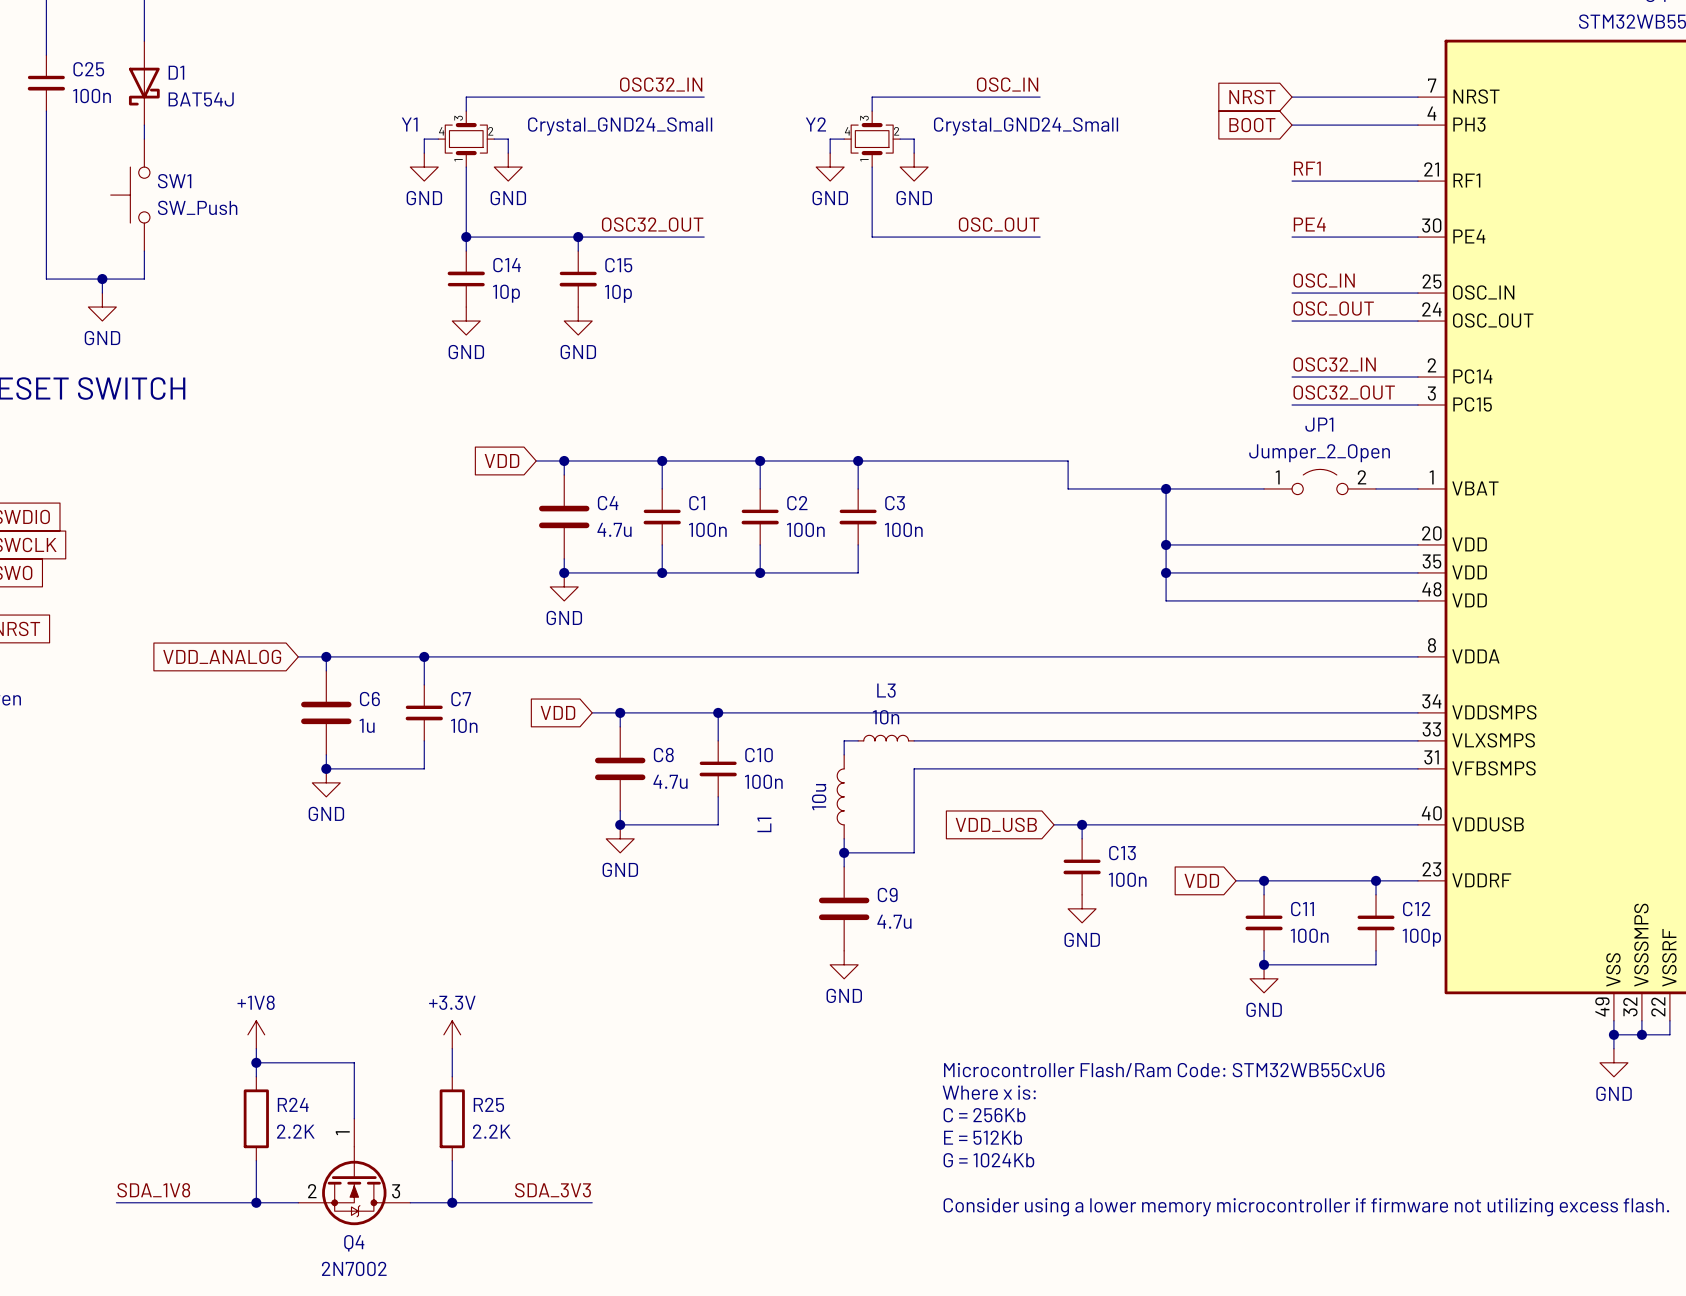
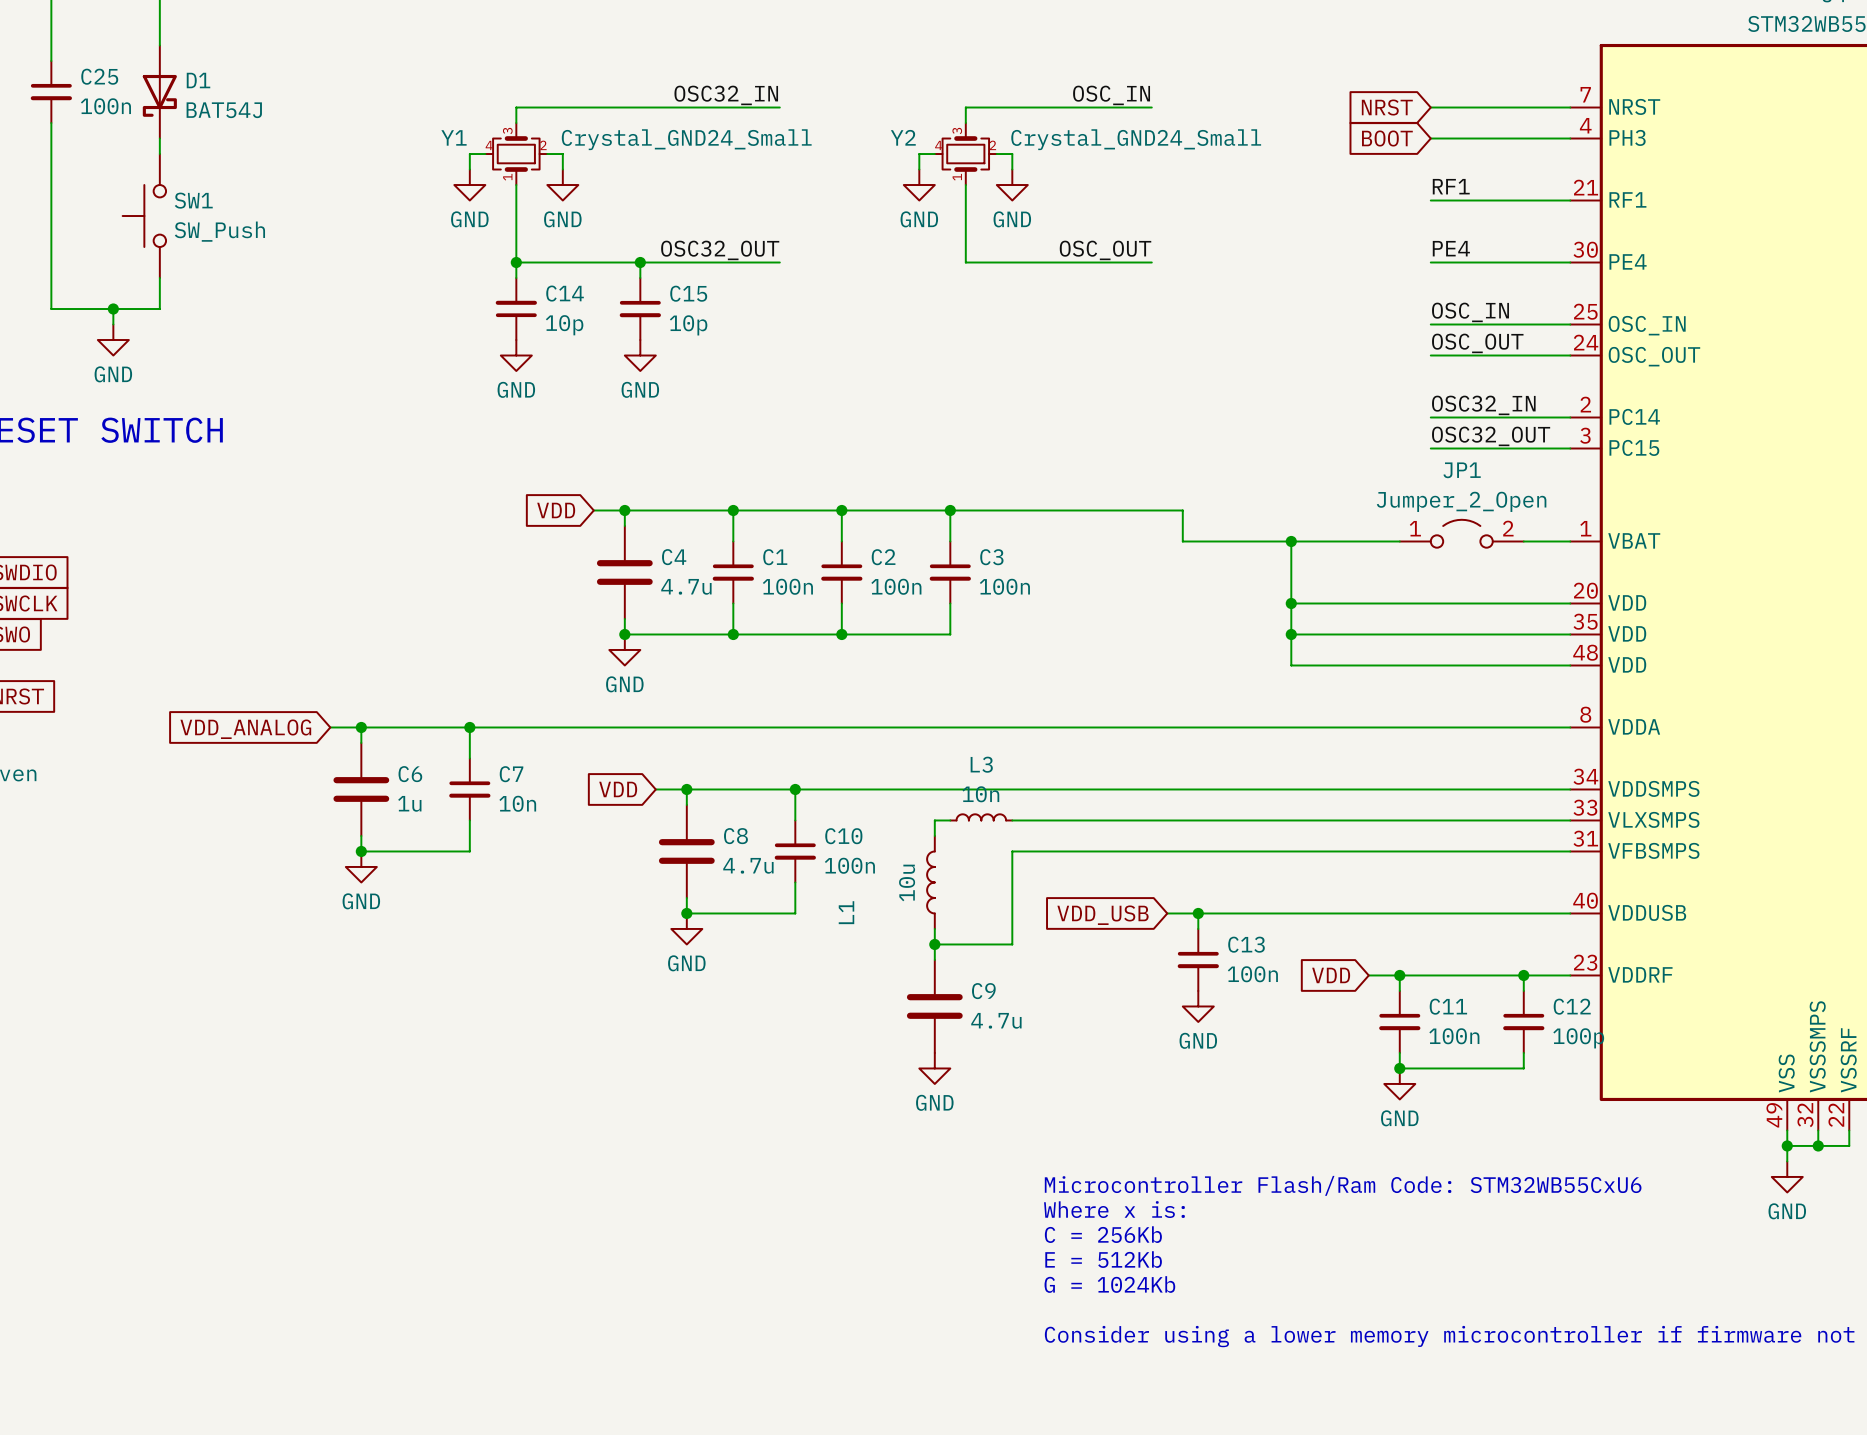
power symbol: +1V8 (256, 1034) -> none
power symbol: +3.3V (452, 1034) -> none
wire: (256, 1048) (256, 1076) -> none
wire: (452, 1048) (452, 1076) -> none
wire: (256, 1062) (354, 1062) (354, 1118) -> none
junction: (256, 1062) -> none
R24: 2.2K (256, 1118) -> none
R25: 2.2K (452, 1118) -> none
wire: (256, 1160) (256, 1202) -> none
wire: (452, 1160) (452, 1202) -> none
Q4: 2N7002 (354, 1171) -> none
label: SDA_1V8 (153, 1190) -> none
label: SDA_3V3 (552, 1190) -> none
wire: (116, 1202) (298, 1202) -> none
junction: (256, 1202) -> none
wire: (410, 1202) (592, 1202) -> none
junction: (452, 1202) -> none

